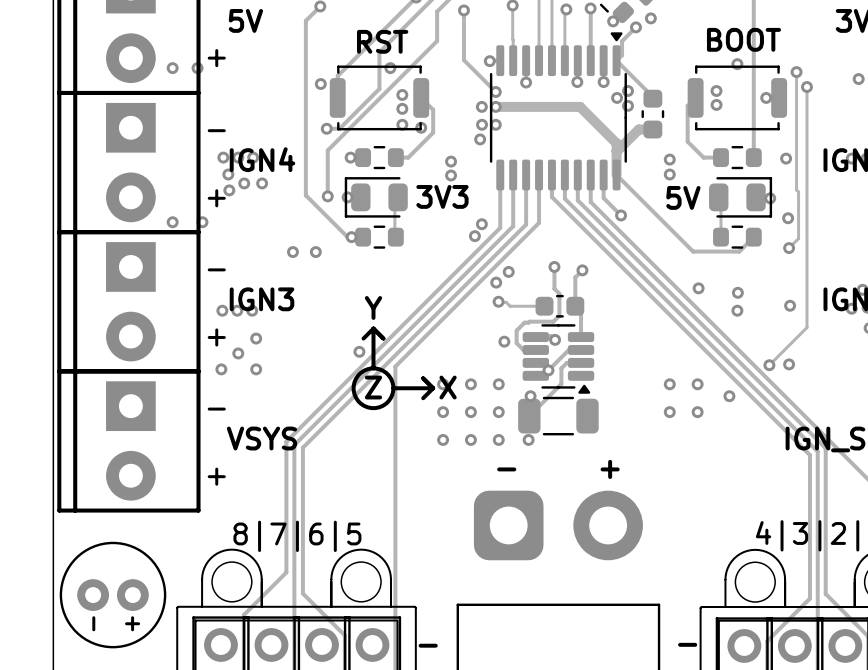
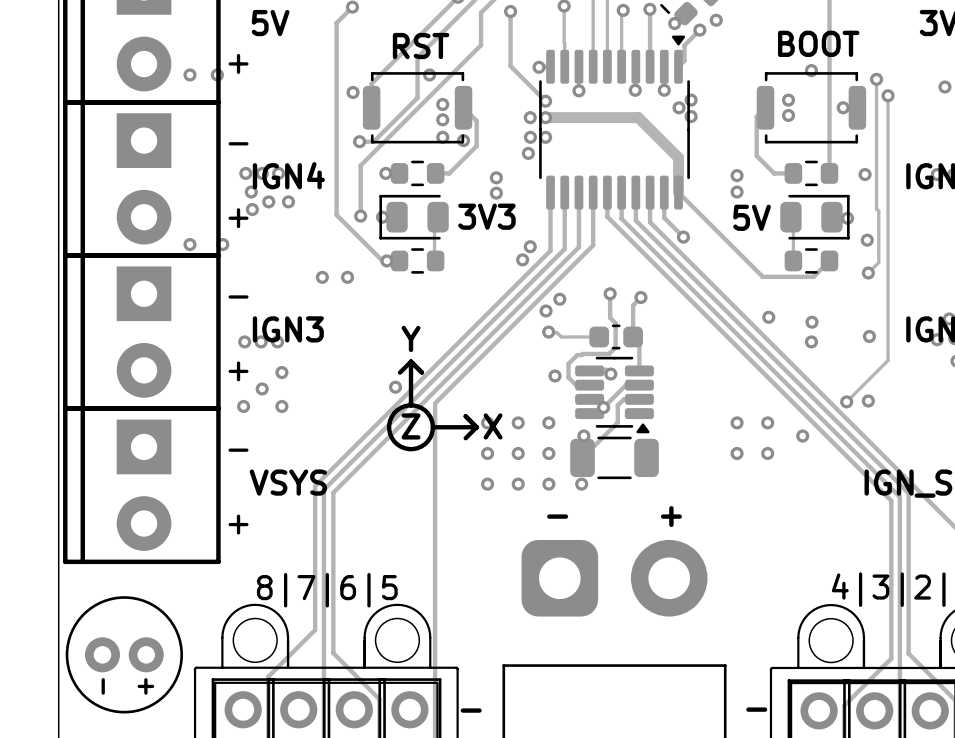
track: (616, 60) (652, 98) -> none
part: (652, 114) -> none
track: (652, 129) (638, 129) (616, 151) -> none

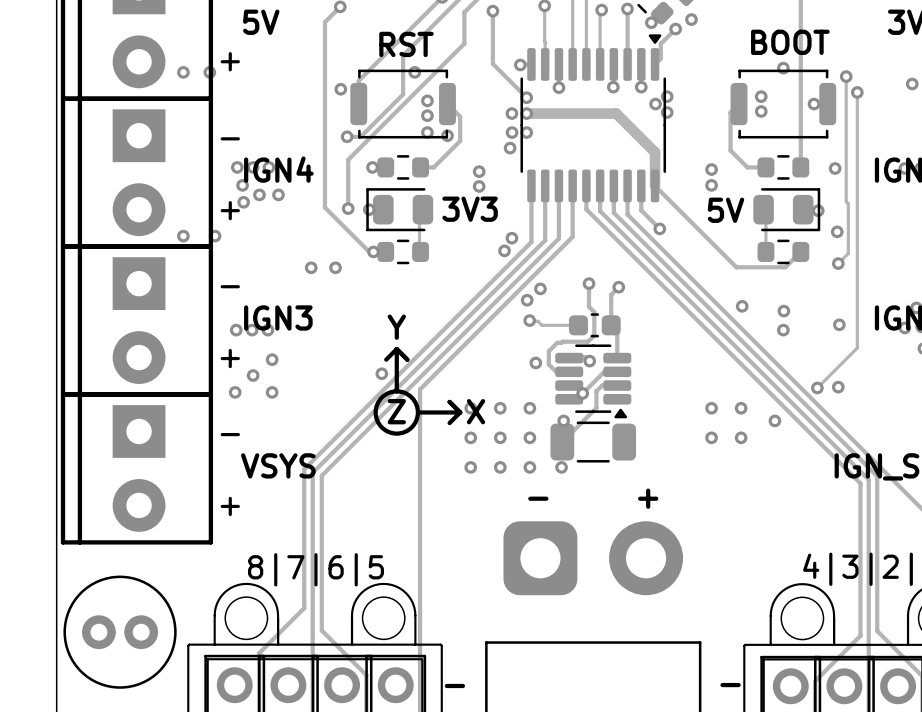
text: - (103, 686) -> none
text: + (145, 686) -> none

